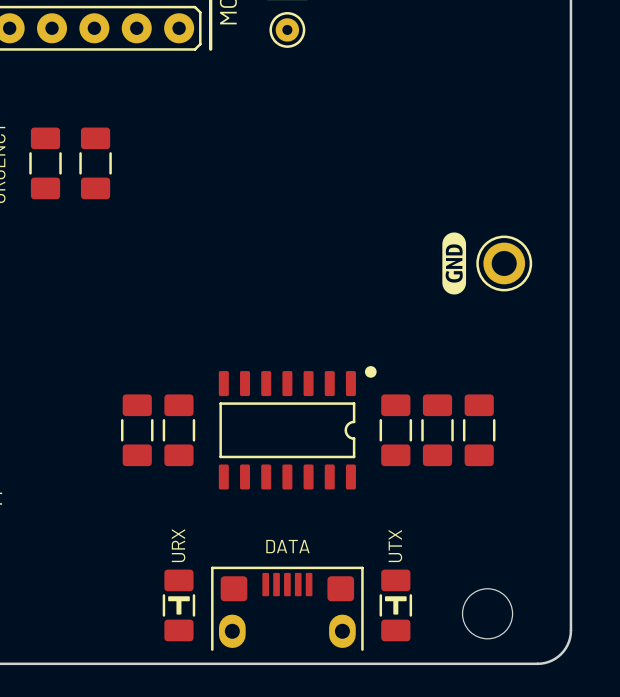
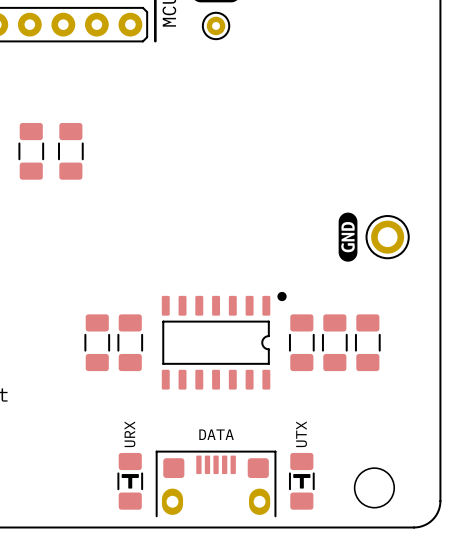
part: (45, 163) -> none
part: (95, 163) -> none
part: none -> (31, 151)
part: none -> (70, 151)
drawing position: (454, 263) -> (348, 237)
part position: (504, 263) -> (387, 237)

